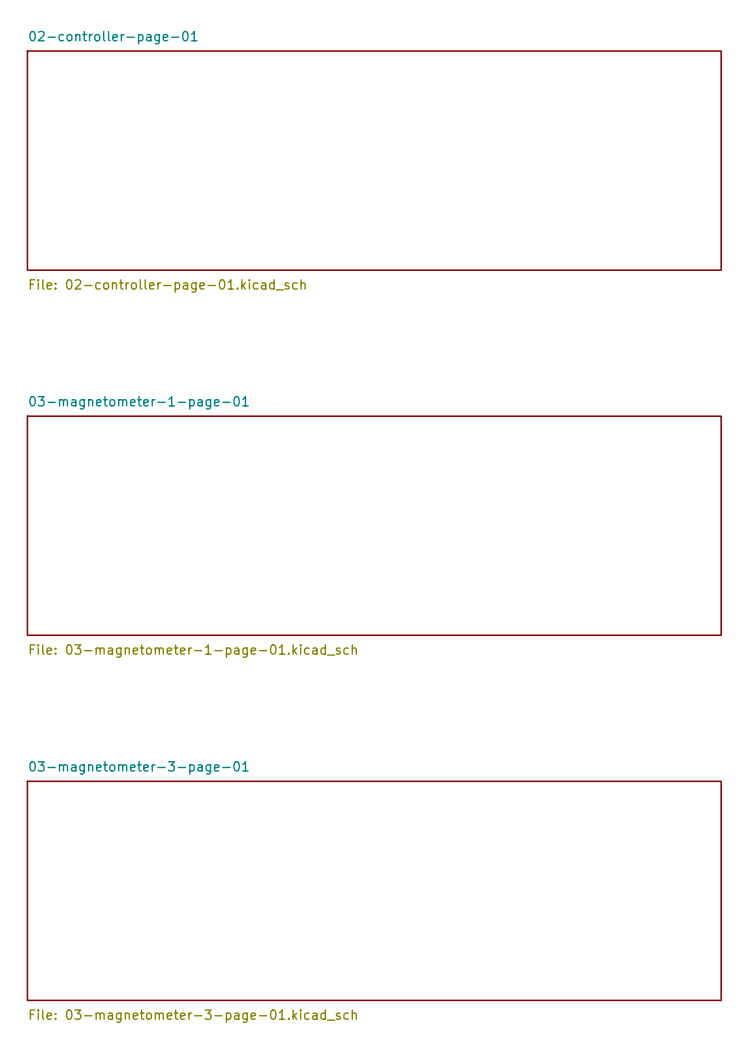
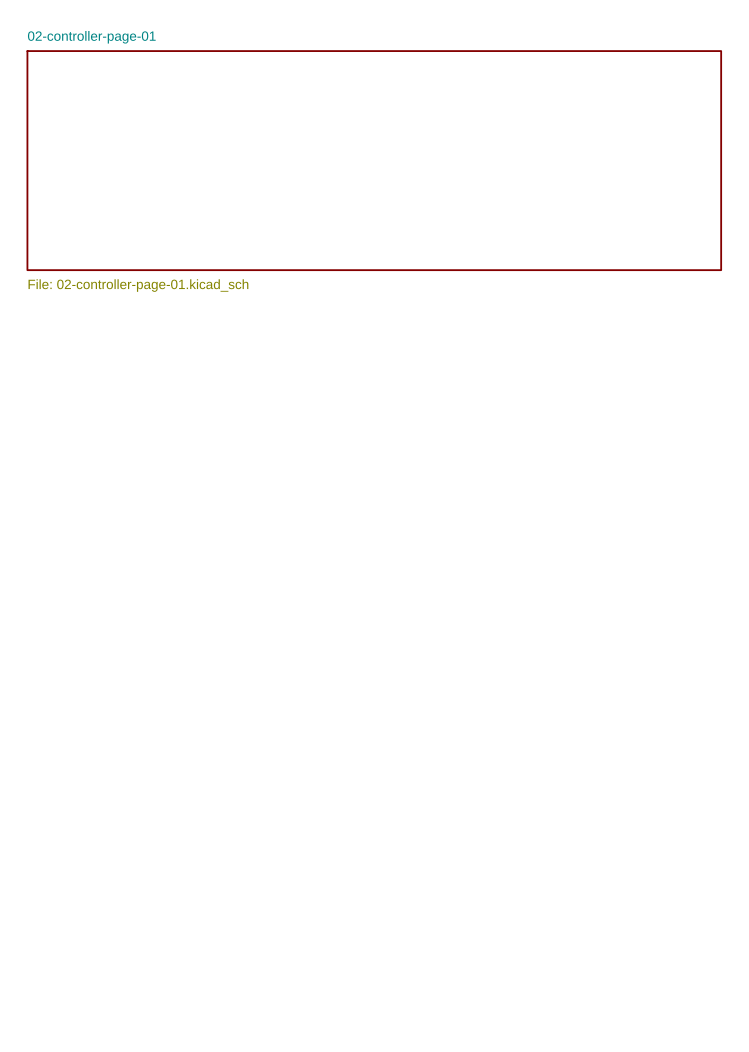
sheet 03-magnetometer-1-page-01: File: 03-magnetometer-1-page-01.kicad_sch (374, 525) -> none
sheet 03-magnetometer-3-page-01: File: 03-magnetometer-3-page-01.kicad_sch (374, 890) -> none

